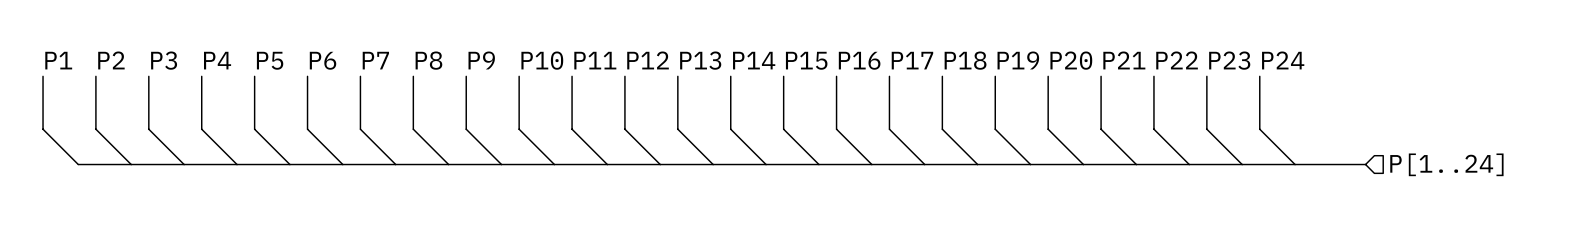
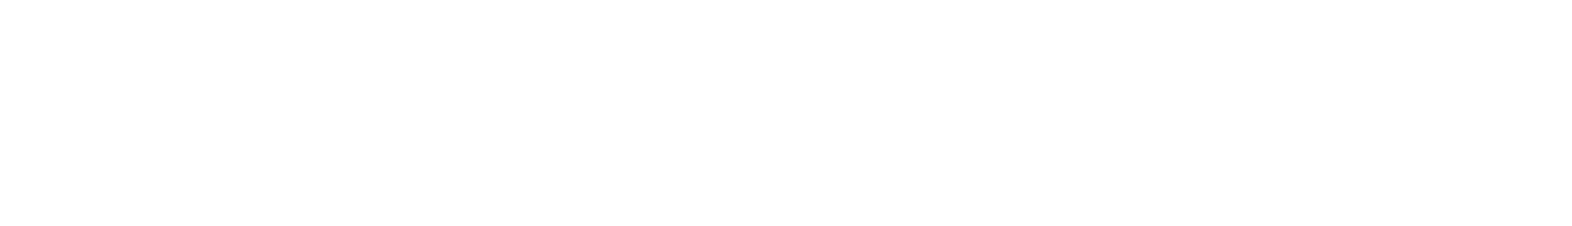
label: P1 (58, 60) -> none
label: P2 (111, 60) -> none
label: P3 (164, 60) -> none
label: P4 (217, 60) -> none
label: P5 (270, 60) -> none
label: P6 (323, 60) -> none
label: P7 (375, 60) -> none
label: P8 (428, 60) -> none
label: P9 (481, 60) -> none
label: P10 (542, 60) -> none
label: P11 (595, 60) -> none
label: P12 (648, 60) -> none
label: P13 (700, 60) -> none
label: P14 (754, 60) -> none
label: P15 (806, 60) -> none
label: P16 (859, 60) -> none
label: P17 (912, 60) -> none
label: P18 (965, 60) -> none
label: P19 (1018, 60) -> none
label: P20 (1071, 60) -> none
label: P21 (1124, 60) -> none
label: P22 (1177, 60) -> none
label: P23 (1229, 60) -> none
label: P24 (1283, 60) -> none
wire: (43, 76) (43, 129) (78, 164) -> none
wire: (95, 76) (95, 129) (131, 164) -> none
wire: (148, 76) (148, 129) (184, 164) -> none
wire: (201, 76) (201, 129) (236, 164) -> none
wire: (254, 76) (254, 129) (289, 164) -> none
wire: (307, 76) (307, 129) (342, 164) -> none
wire: (360, 76) (360, 129) (395, 164) -> none
wire: (413, 76) (413, 129) (448, 164) -> none
wire: (466, 76) (466, 129) (501, 164) -> none
wire: (519, 76) (519, 129) (554, 164) -> none
wire: (572, 76) (572, 129) (607, 164) -> none
wire: (624, 76) (624, 129) (660, 164) -> none
wire: (677, 76) (677, 129) (713, 164) -> none
wire: (730, 76) (730, 129) (766, 164) -> none
wire: (783, 76) (783, 129) (818, 164) -> none
wire: (836, 76) (836, 129) (871, 164) -> none
wire: (889, 76) (889, 129) (924, 164) -> none
wire: (942, 76) (942, 129) (977, 164) -> none
wire: (995, 76) (995, 129) (1030, 164) -> none
wire: (1048, 76) (1048, 129) (1083, 164) -> none
wire: (1101, 76) (1101, 129) (1136, 164) -> none
wire: (1153, 76) (1153, 129) (1189, 164) -> none
wire: (1206, 76) (1206, 129) (1242, 164) -> none
wire: (1259, 76) (1259, 129) (1295, 164) -> none
bus: (78, 164) (1365, 164) -> none
hierarchical label: P[1..24] (1446, 164) -> none

